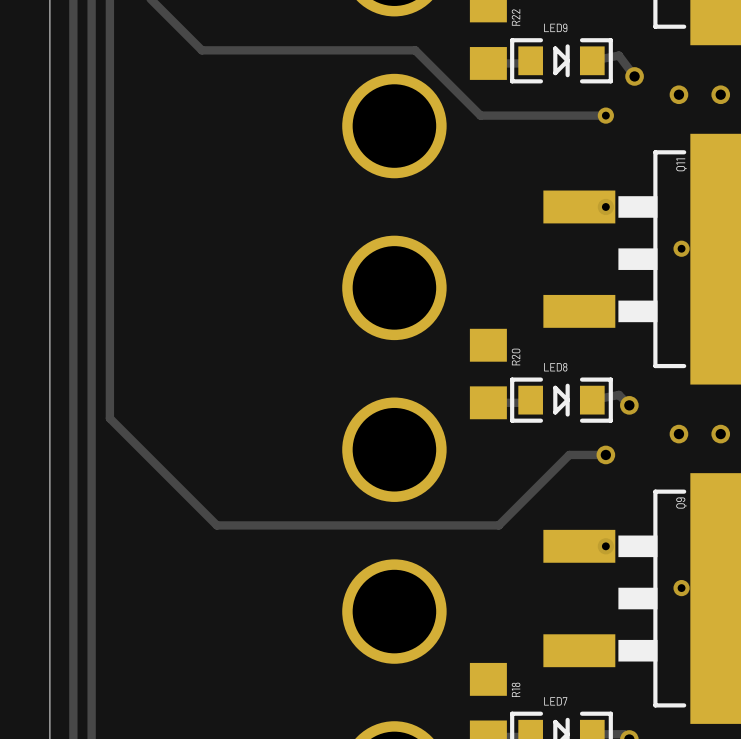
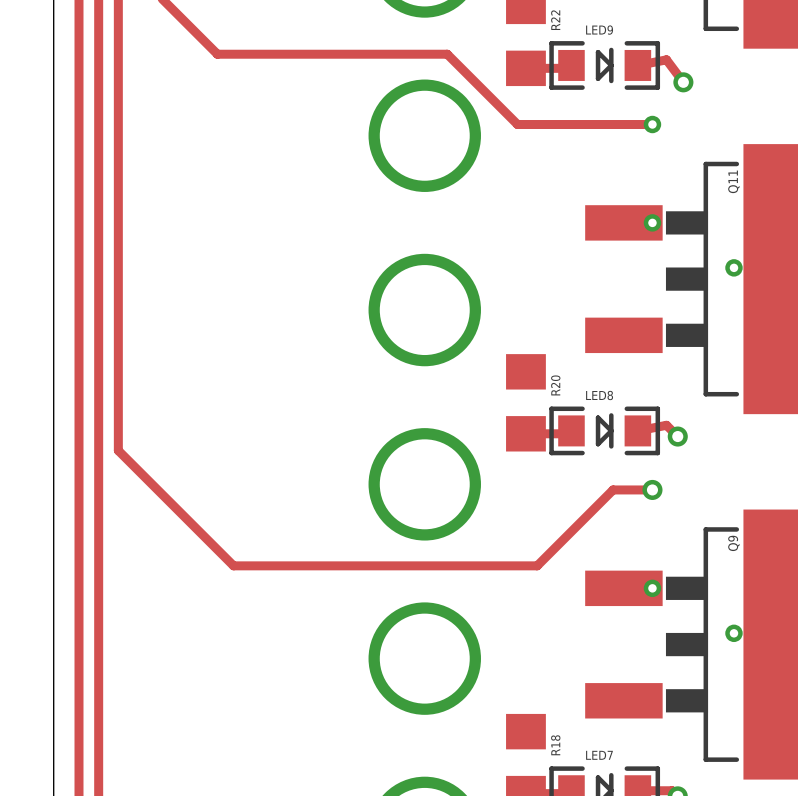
via: (678, 94) -> none
via: (720, 94) -> none
via: (678, 434) -> none
via: (720, 434) -> none

